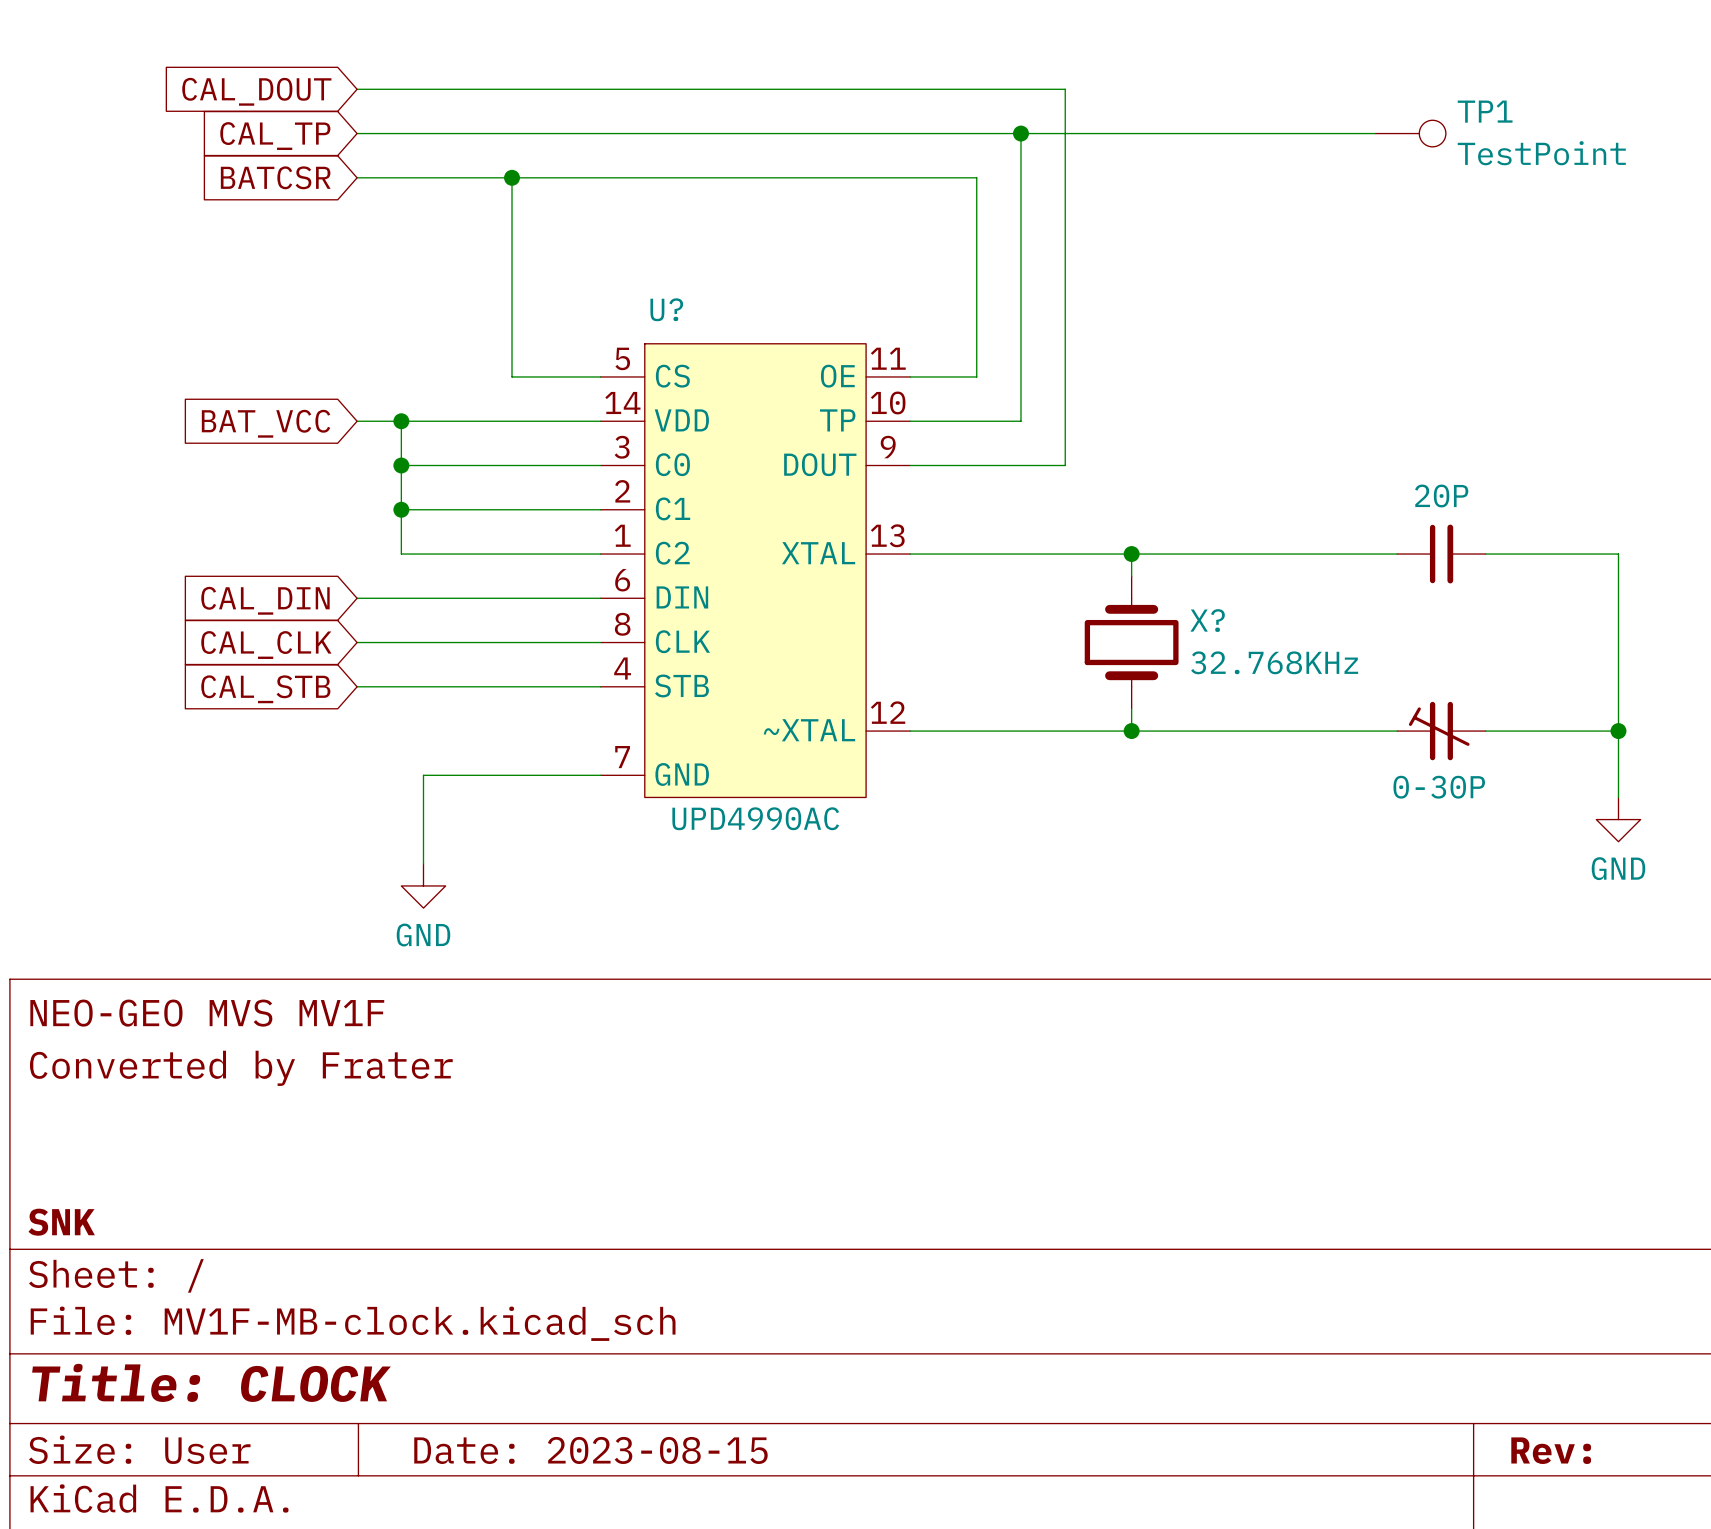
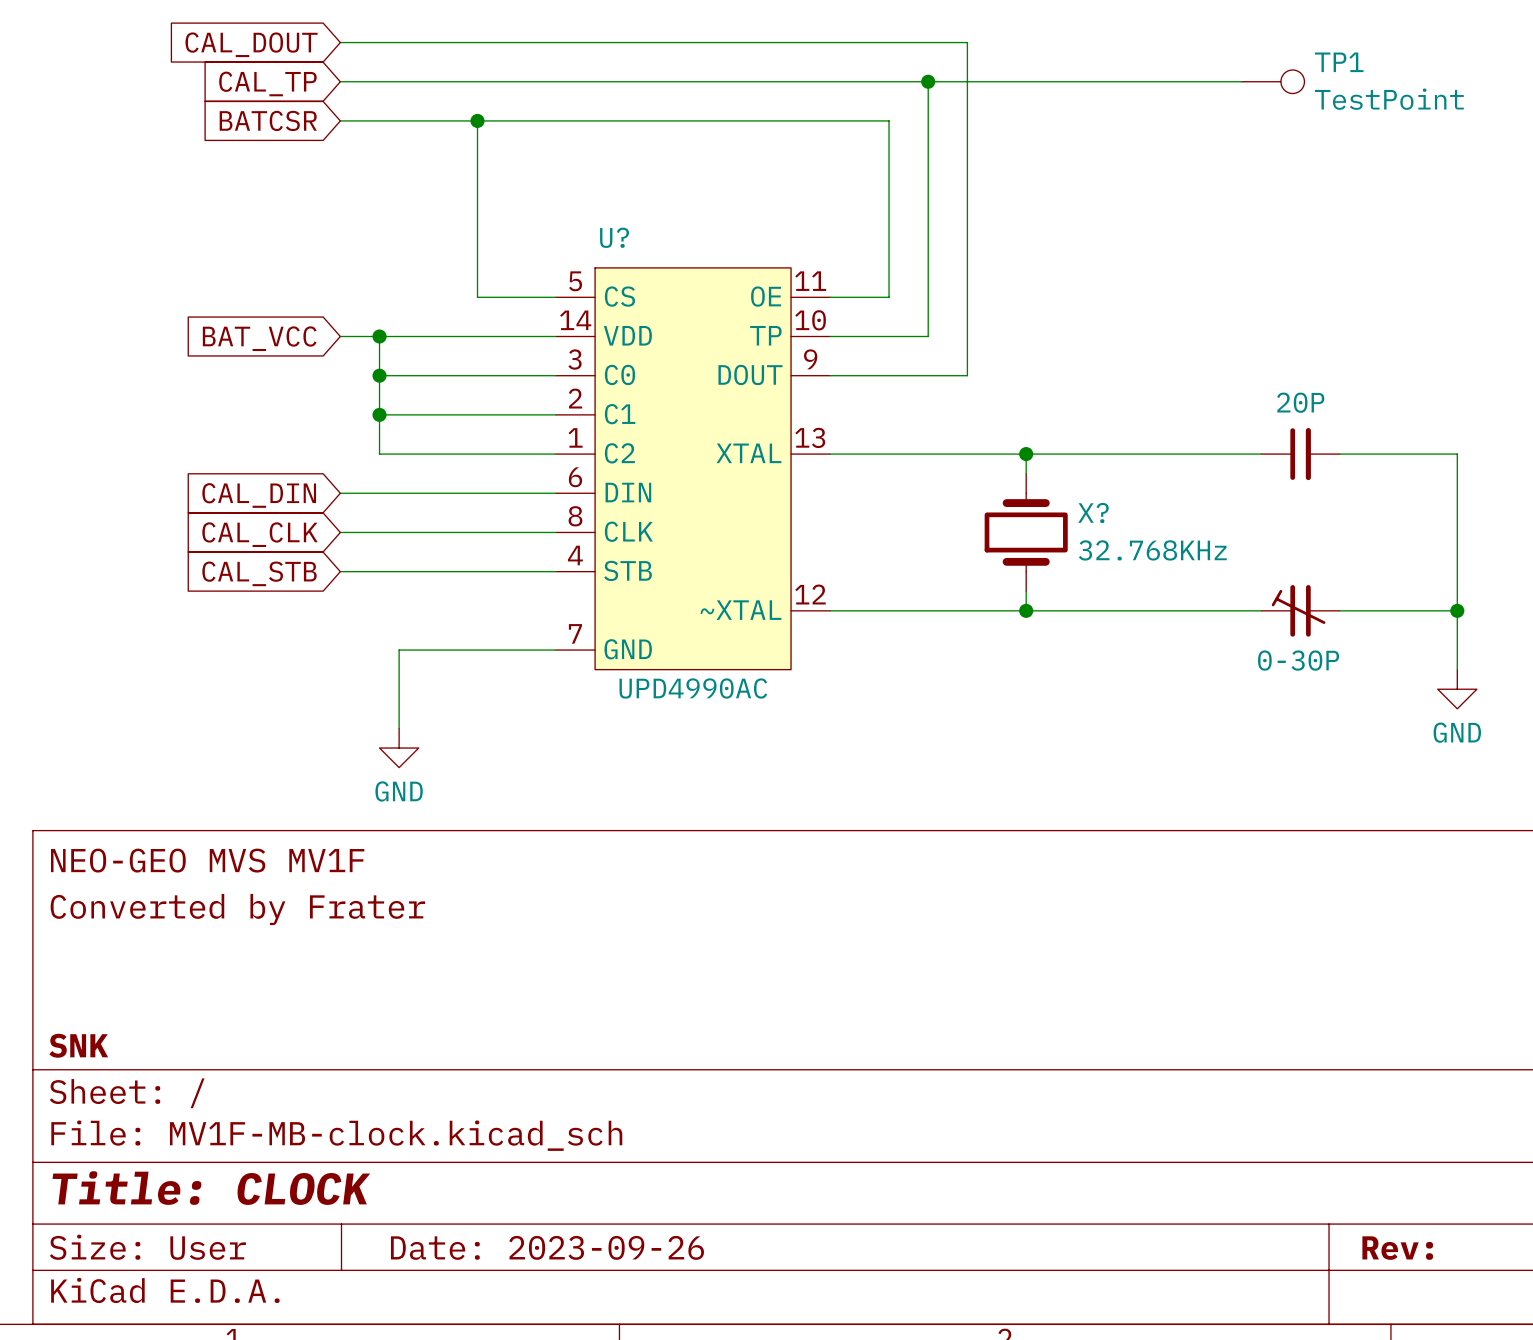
title block: Date: 2023-08-15 (590, 1450) -> Date: 2023-09-26 (547, 1247)

